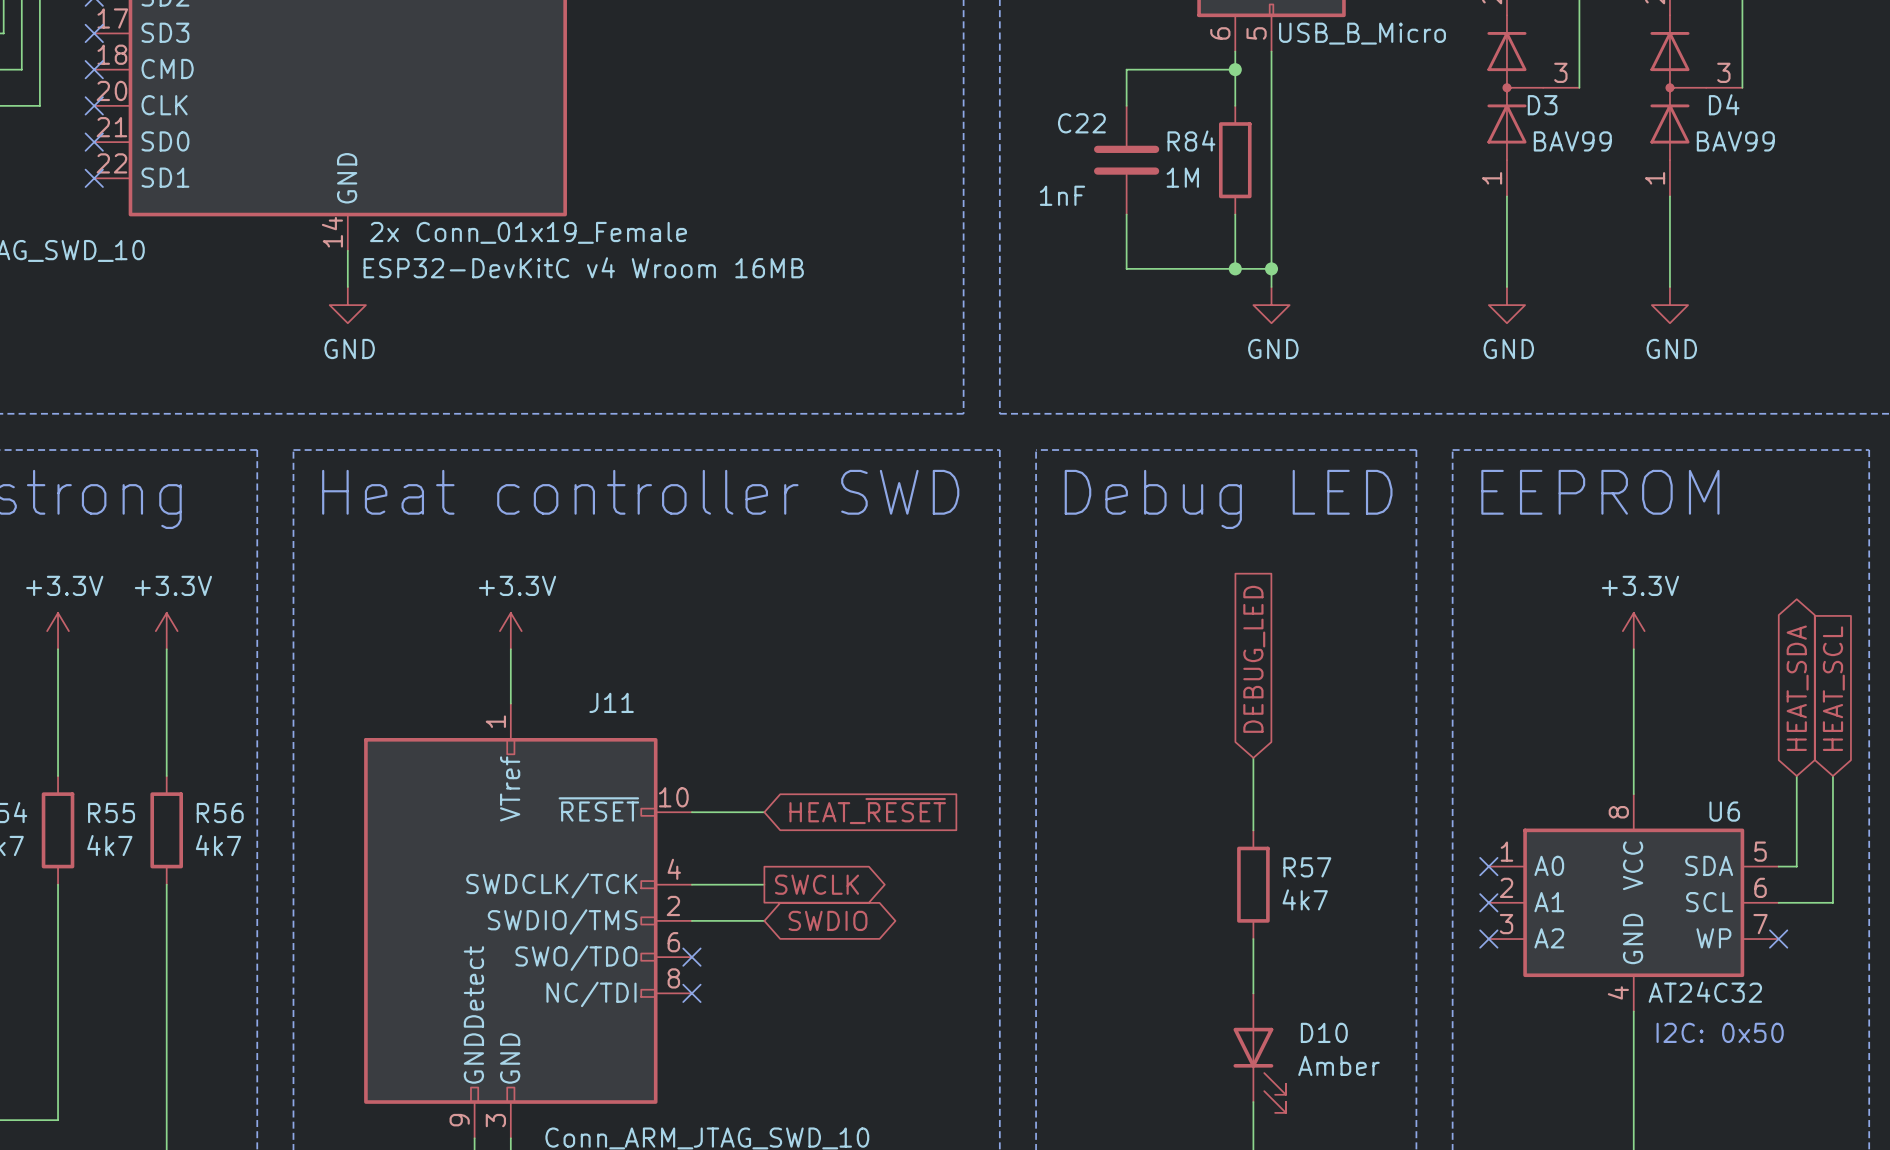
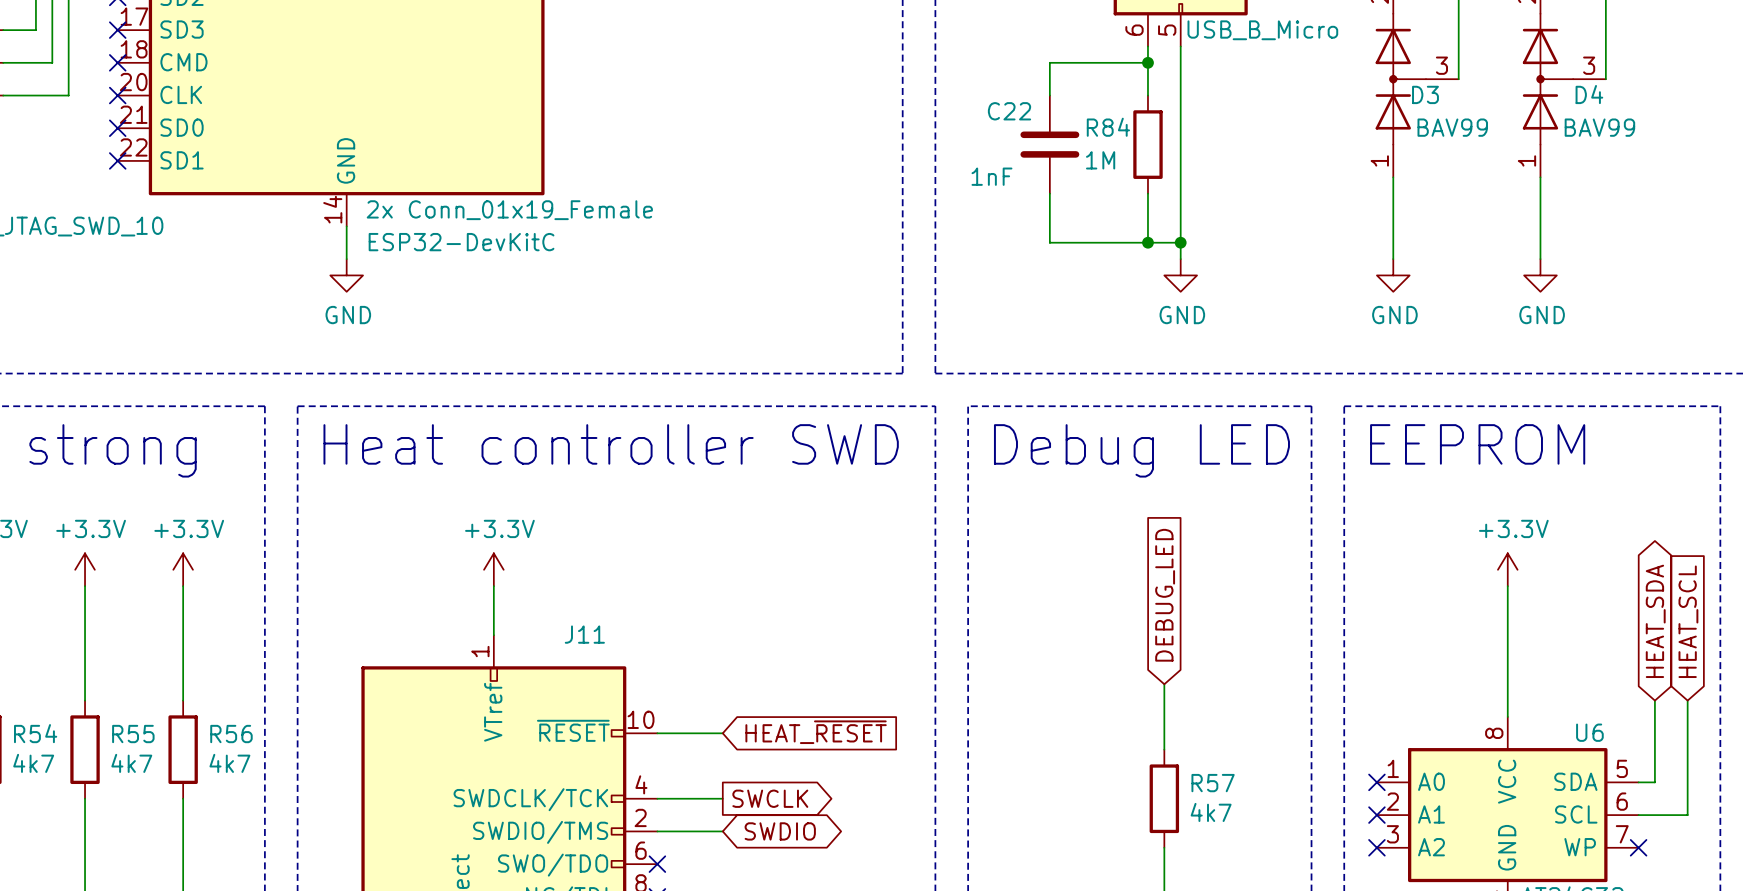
part text: ESP32-DevKitC v4 Wroom 16MB (583, 267) -> ESP32-DevKitC (461, 242)

